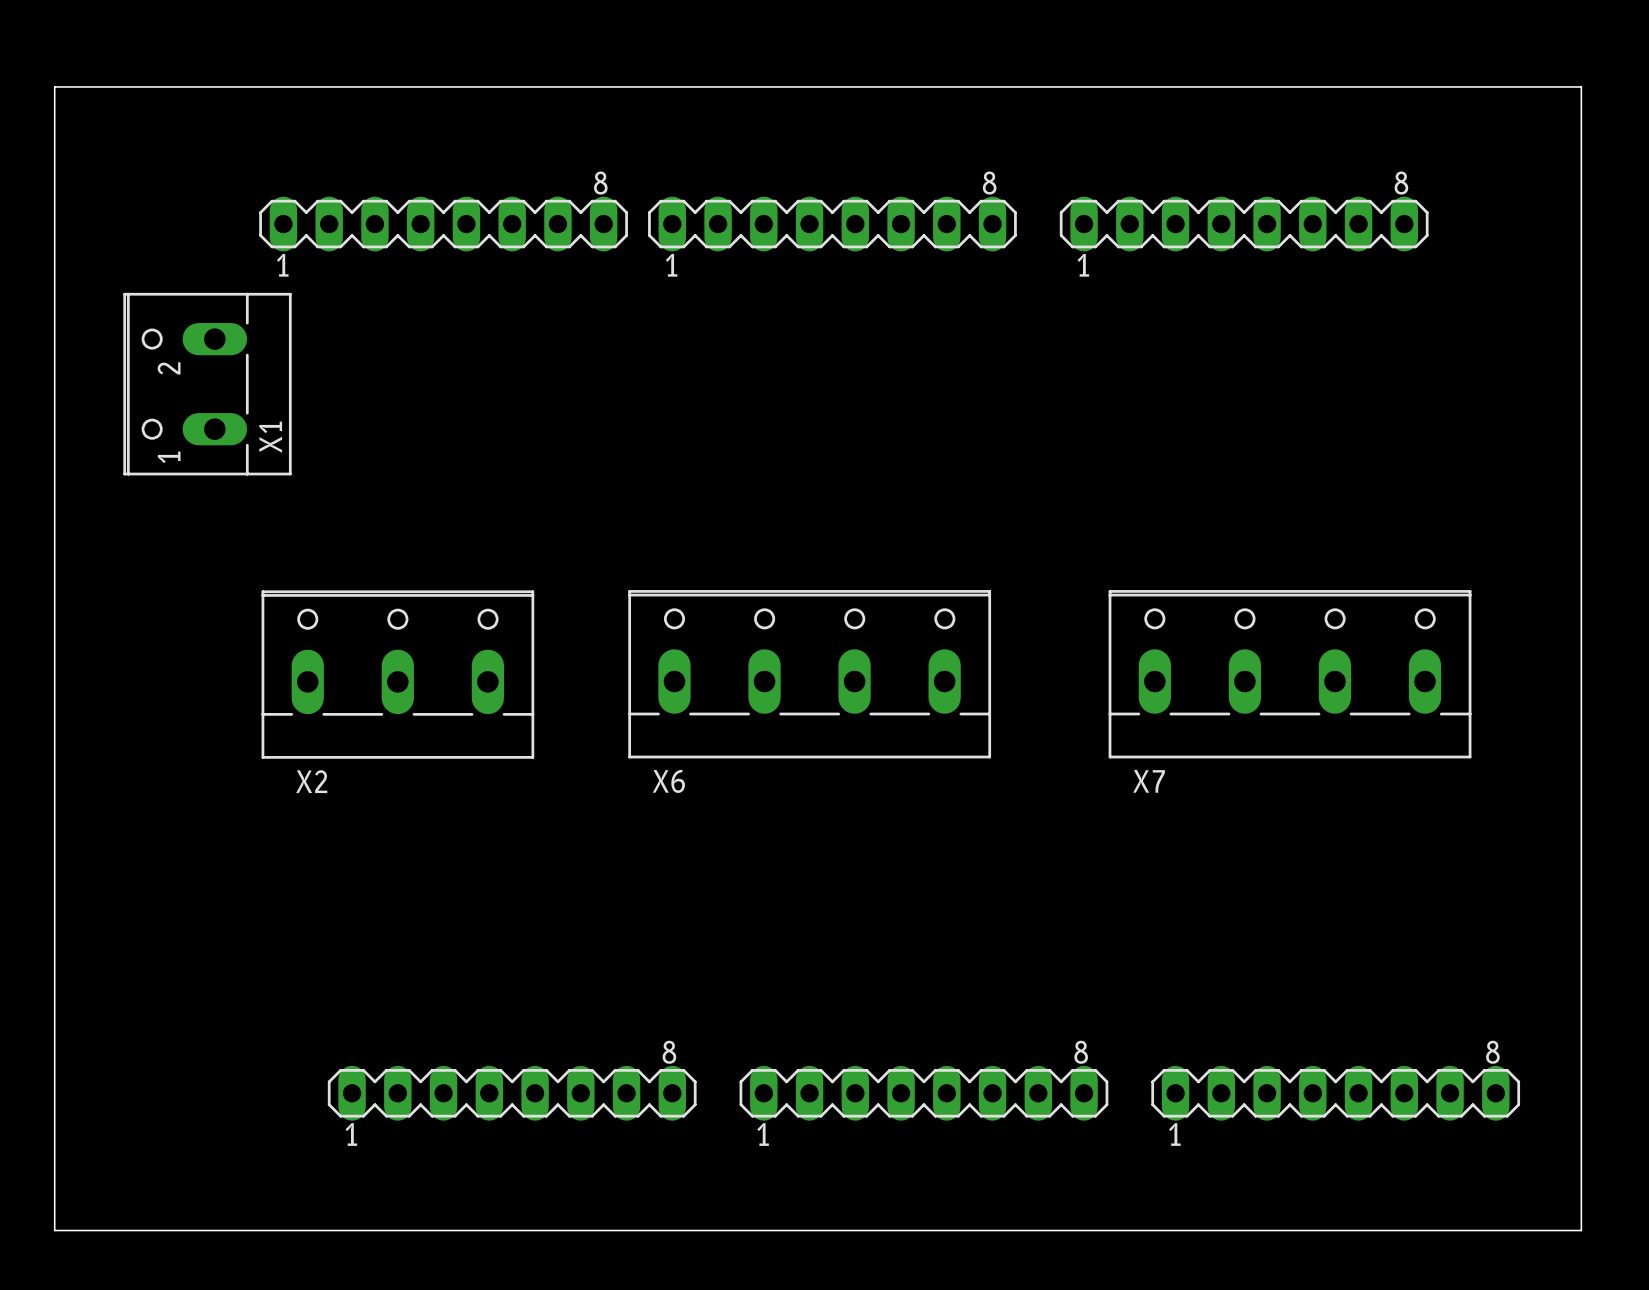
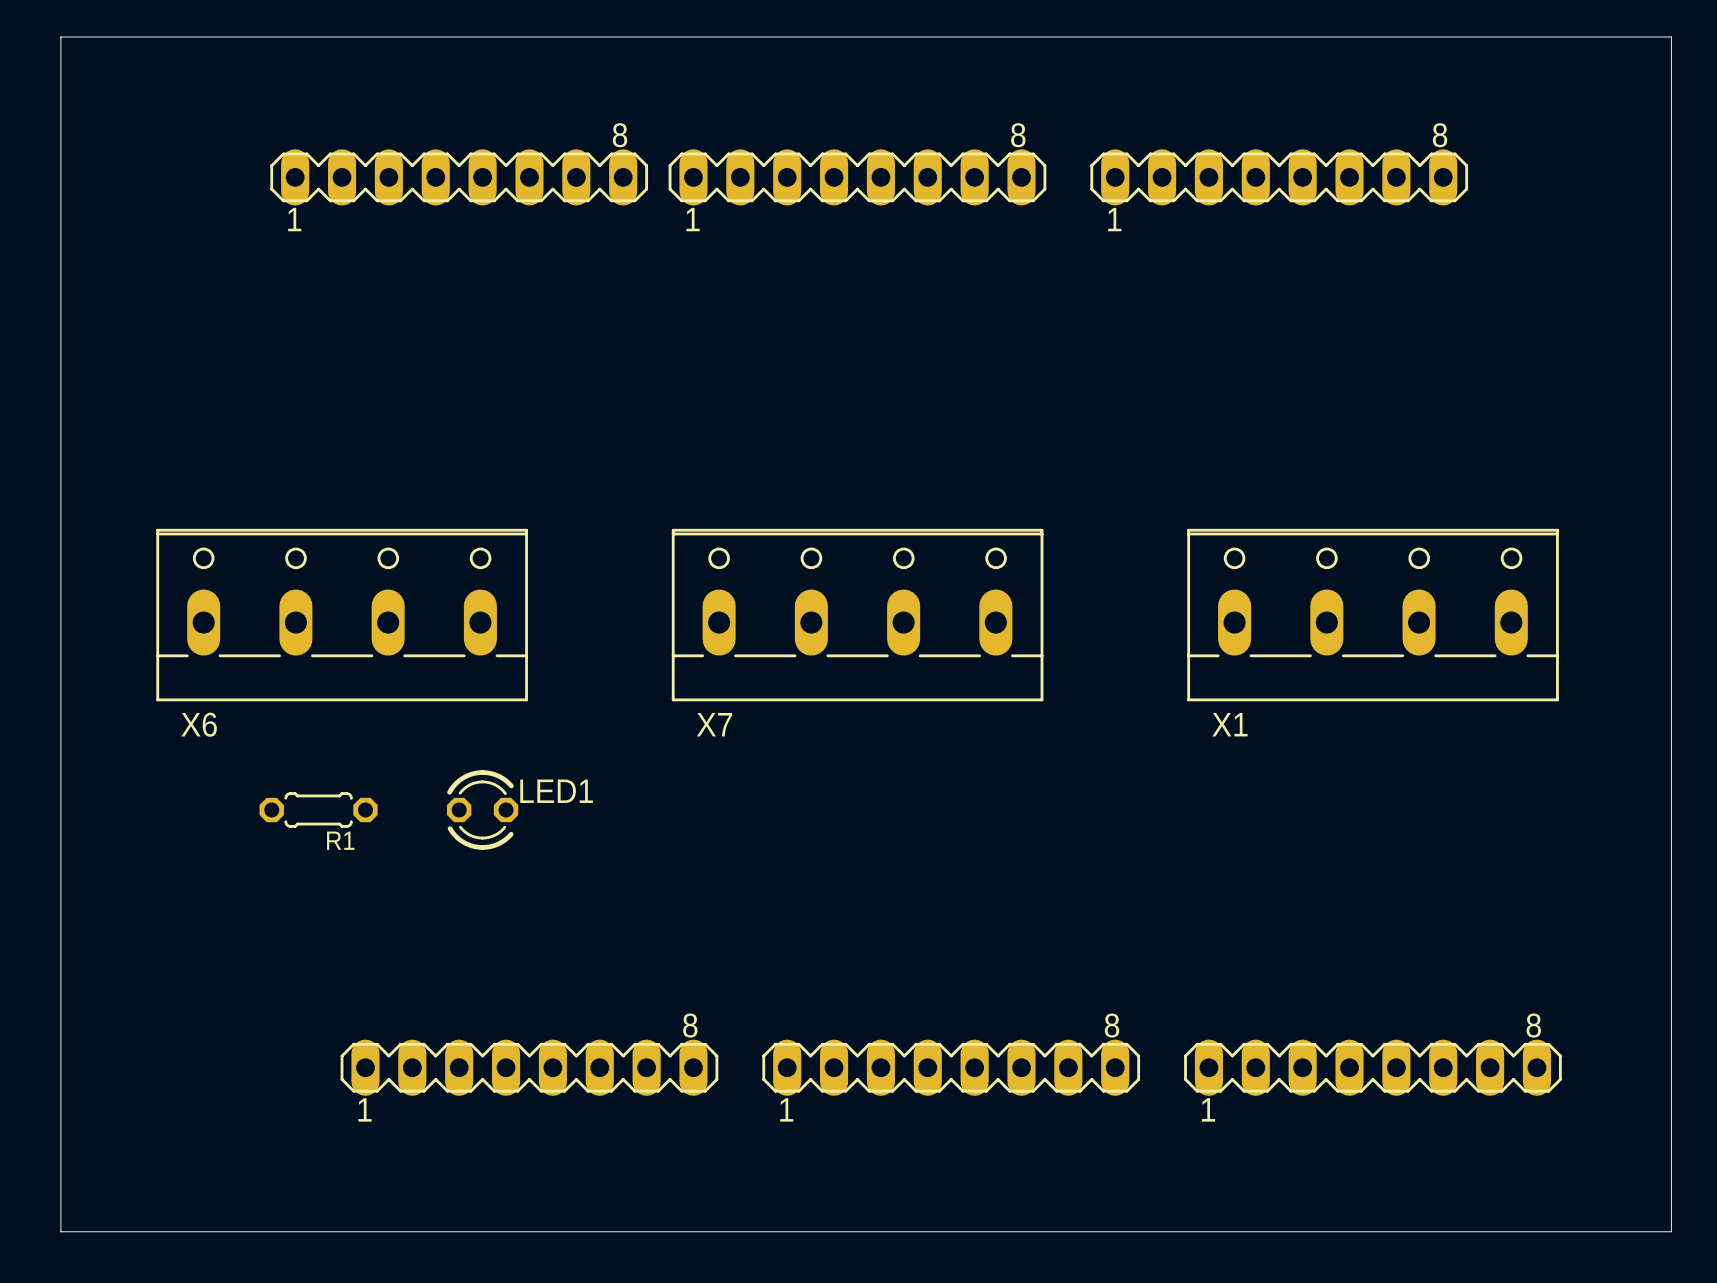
board edge: (1581, 86) (1581, 1230) (54, 1230) -> (1624, 36) (1671, 36) (1671, 1231) (60, 1231) (60, 1208)
X1 footprint: [123, 292, 292, 476] -> [1187, 528, 1559, 702]
X1 name position: X1 (270, 437) -> X1 (1229, 724)
X2: (397, 674) -> none
X6 position: (809, 674) -> (342, 615)
X7 position: (1290, 674) -> (857, 615)
R1: none -> (318, 809)
LED1: none -> (482, 809)

